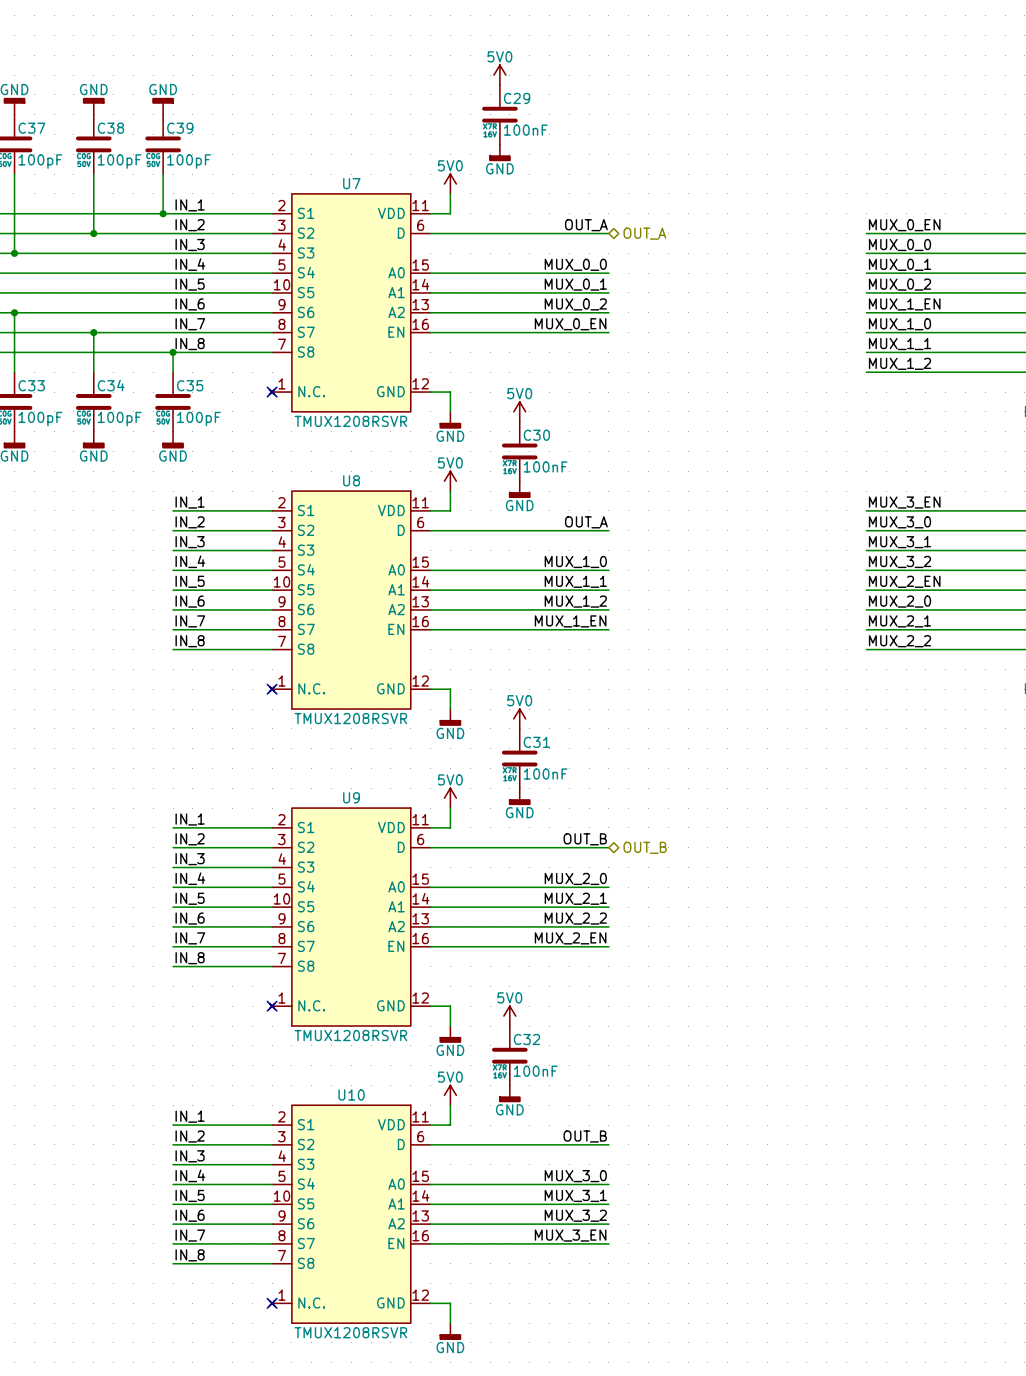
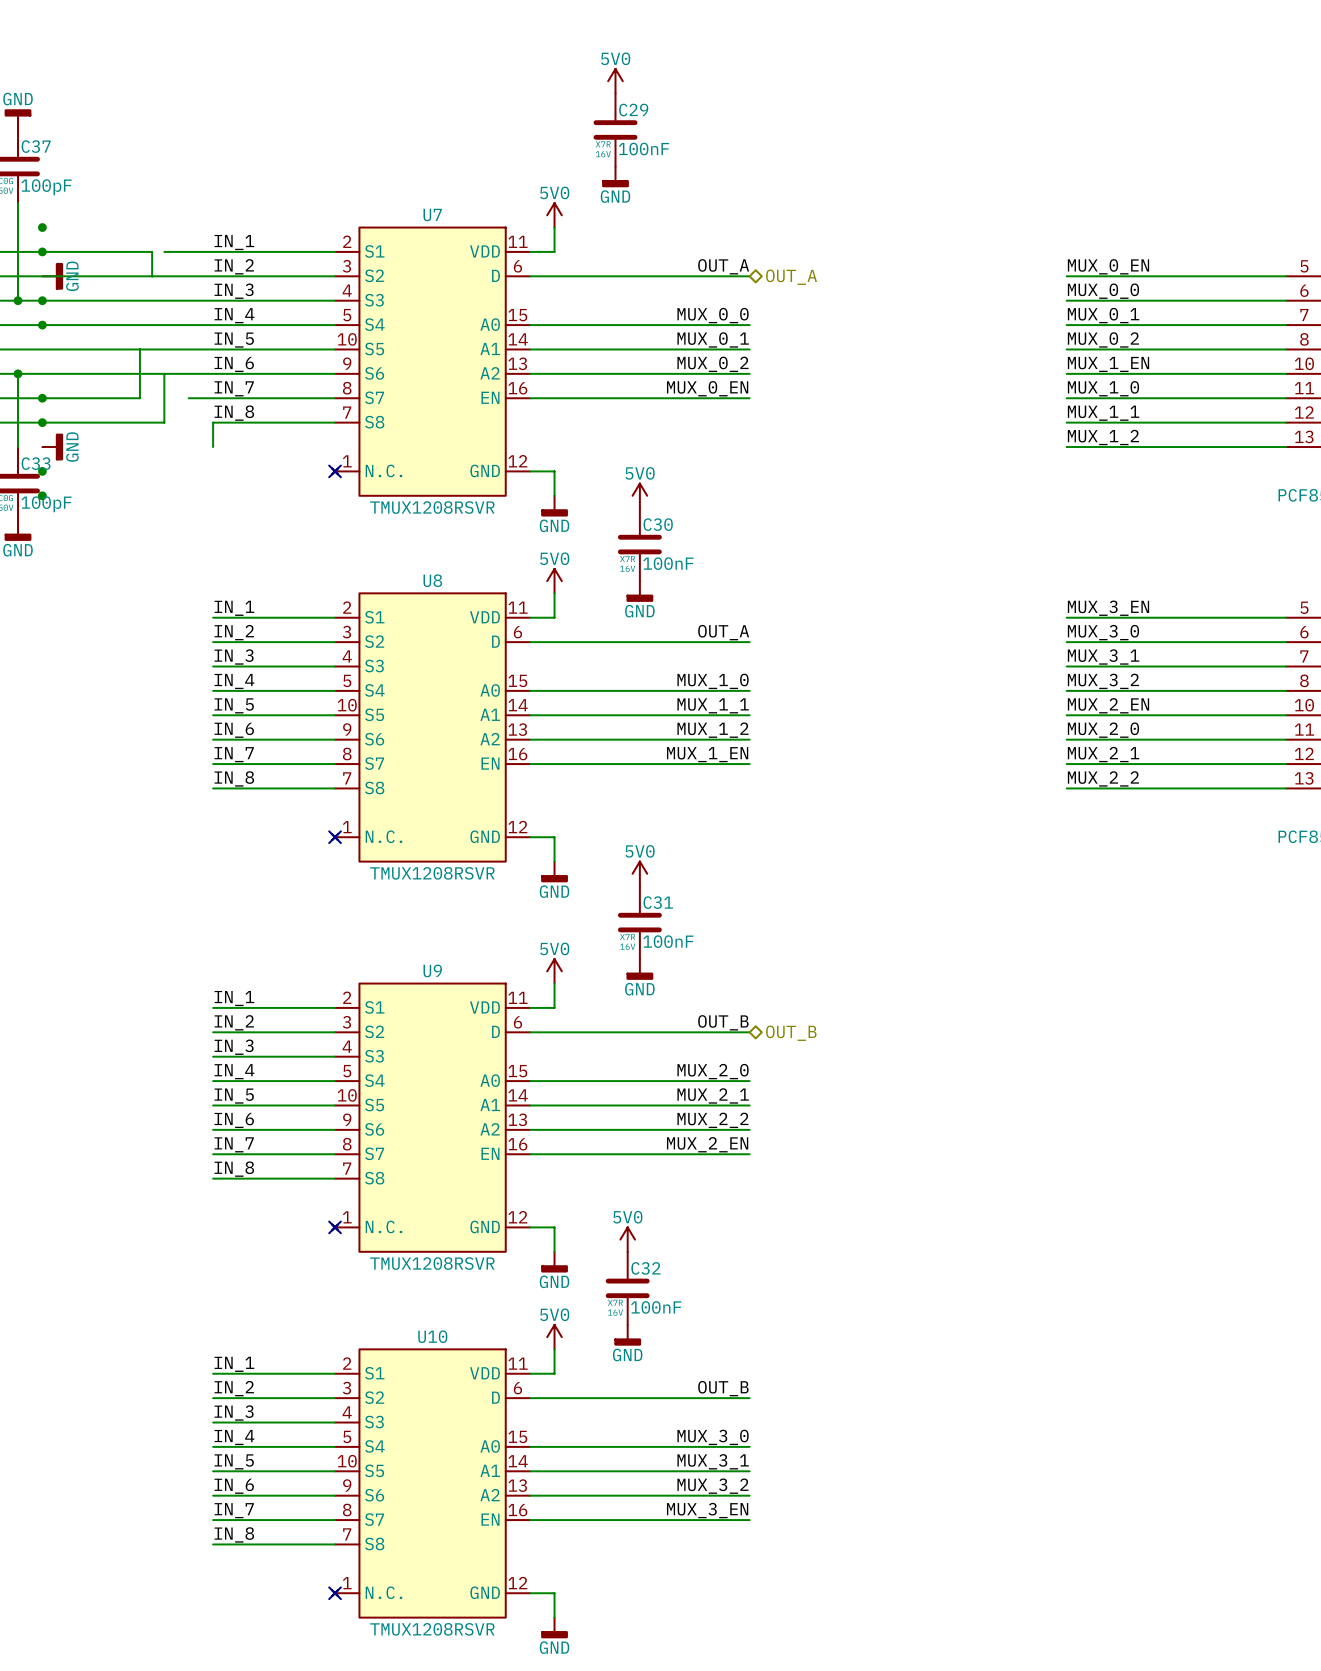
power symbol: GND (93, 106) -> none
power symbol: GND (163, 106) -> none
C38: 100pF (93, 144) -> none
C39: 100pF (163, 144) -> none
wire: (93, 174) (93, 233) -> none
wire: (163, 174) (163, 213) -> none
junction: none -> (42, 227)
junction: none -> (42, 251)
wire: (123, 213) (133, 213) -> (152, 251) (152, 276)
junction: (163, 213) -> none
power symbol: none -> GND (52, 276)
junction: (93, 233) -> none
junction: none -> (42, 300)
junction: none -> (42, 325)
junction: none -> (42, 398)
wire: (93, 332) (93, 372) -> none
junction: (93, 332) -> none
wire: (113, 332) (153, 332) -> (139, 398) (139, 349)
junction: none -> (42, 422)
wire: (133, 352) (173, 352) -> (164, 422) (164, 373)
junction: (173, 352) -> none
power symbol: none -> GND (52, 447)
junction: none -> (42, 471)
C34: 100pF (93, 401) -> none
C35: 100pF (173, 401) -> none
junction: none -> (42, 495)
power symbol: GND (93, 440) -> none
power symbol: GND (173, 440) -> none

